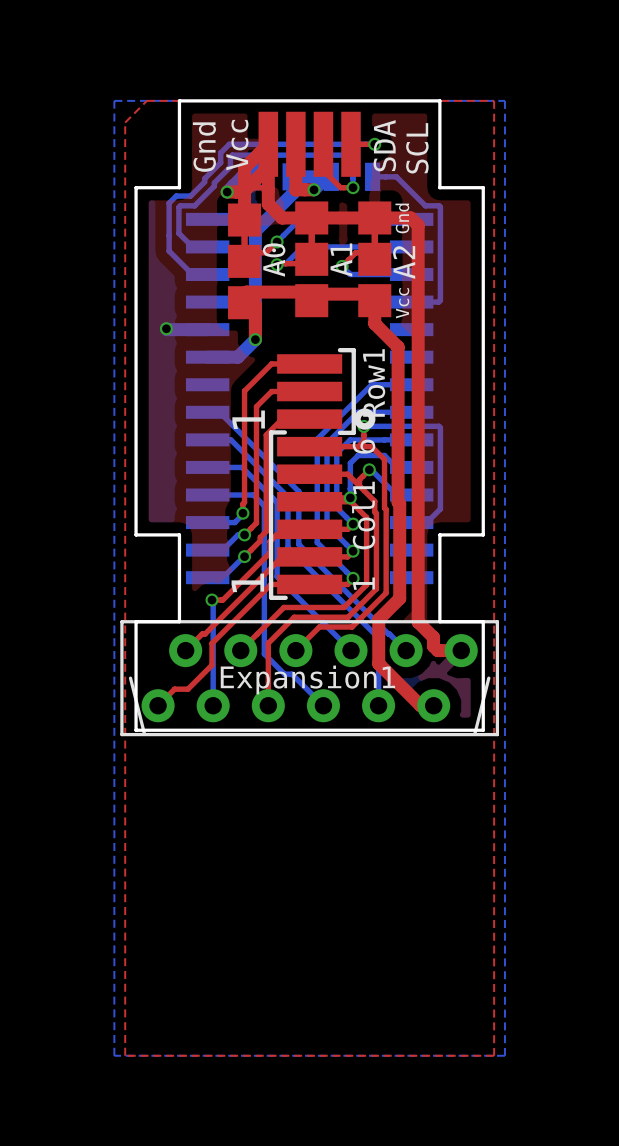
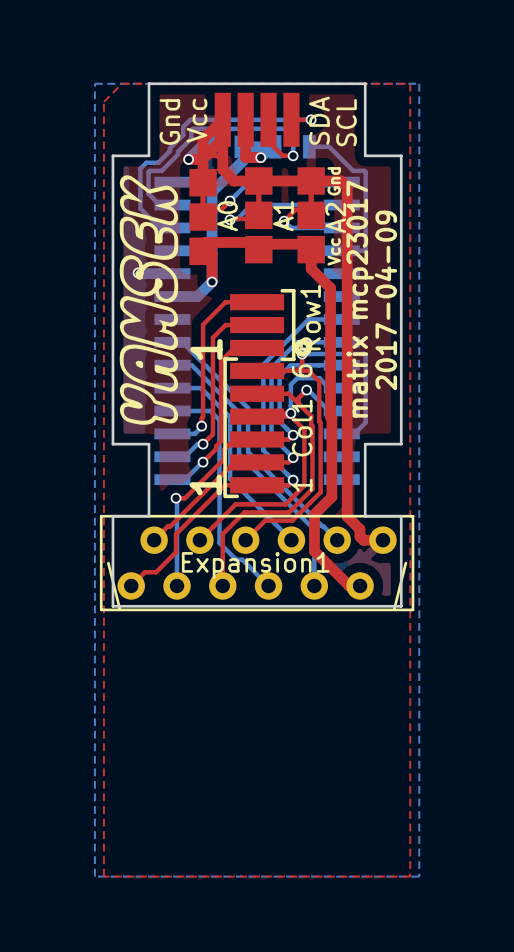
drawing: none -> [119, 175, 179, 425]
text: none -> matrix mcp23017 (360, 299)
text: none -> 2017-04-09 (385, 300)

